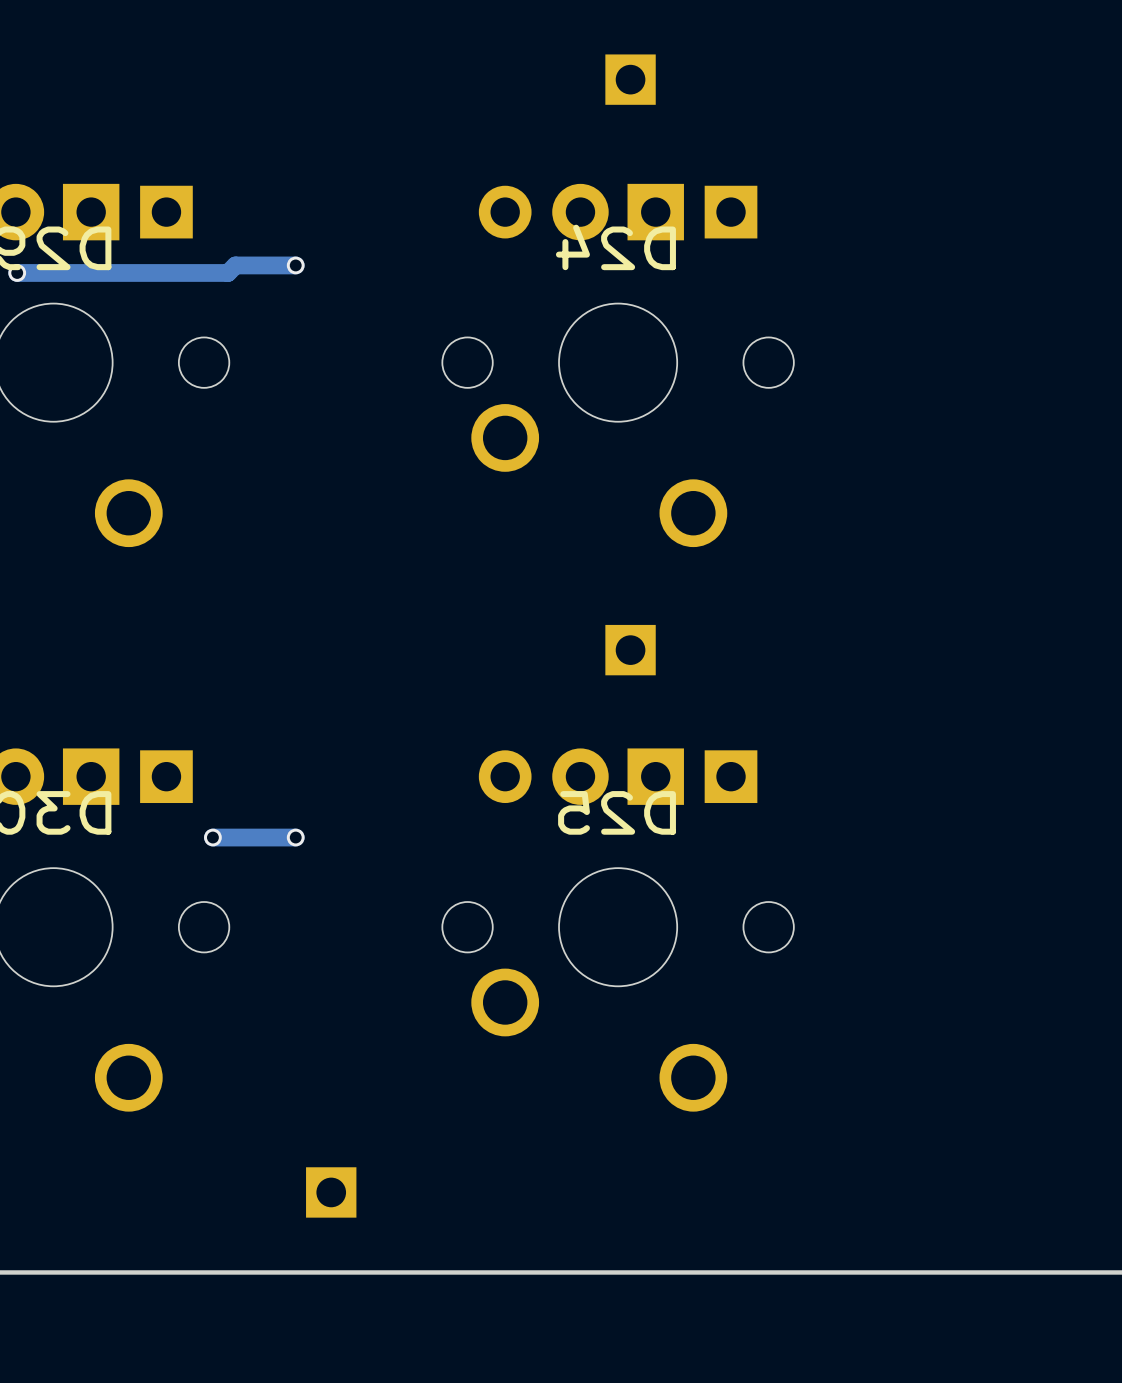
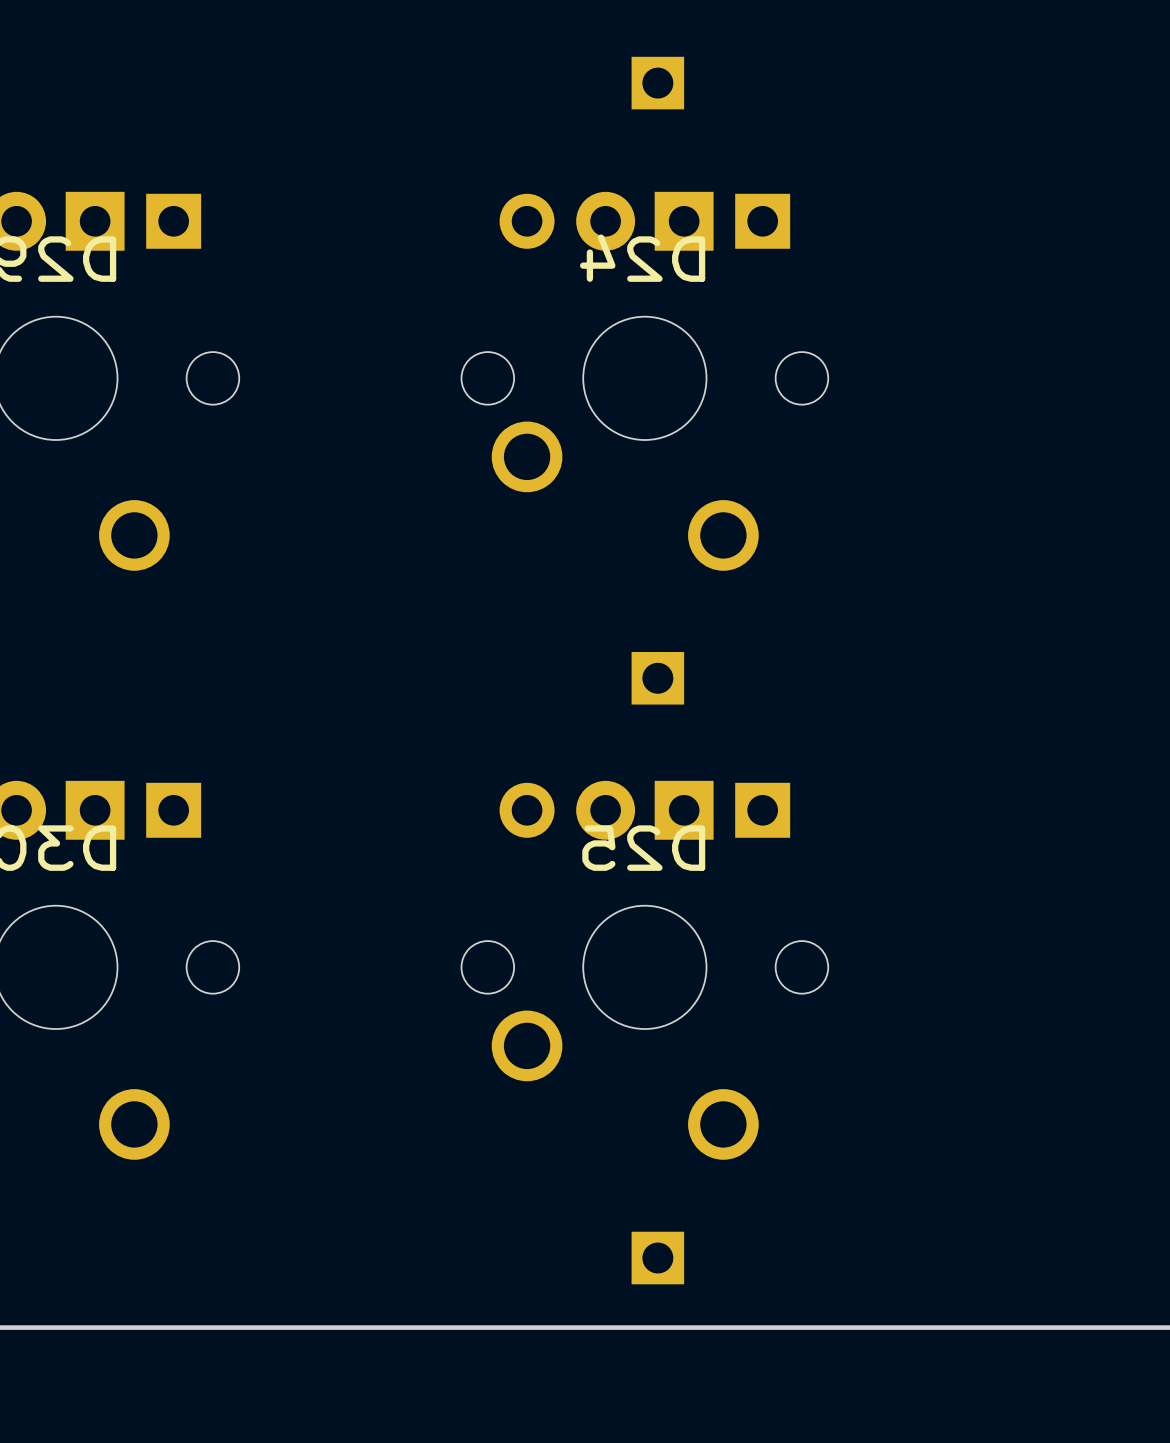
track: (295, 265) (235, 265) (227, 272) (17, 272) -> none
via: (295, 265) -> none
via: (17, 272) -> none
via: (212, 837) -> none
track: (295, 837) (212, 837) -> none
via: (295, 837) -> none
part position: (331, 1192) -> (657, 1258)

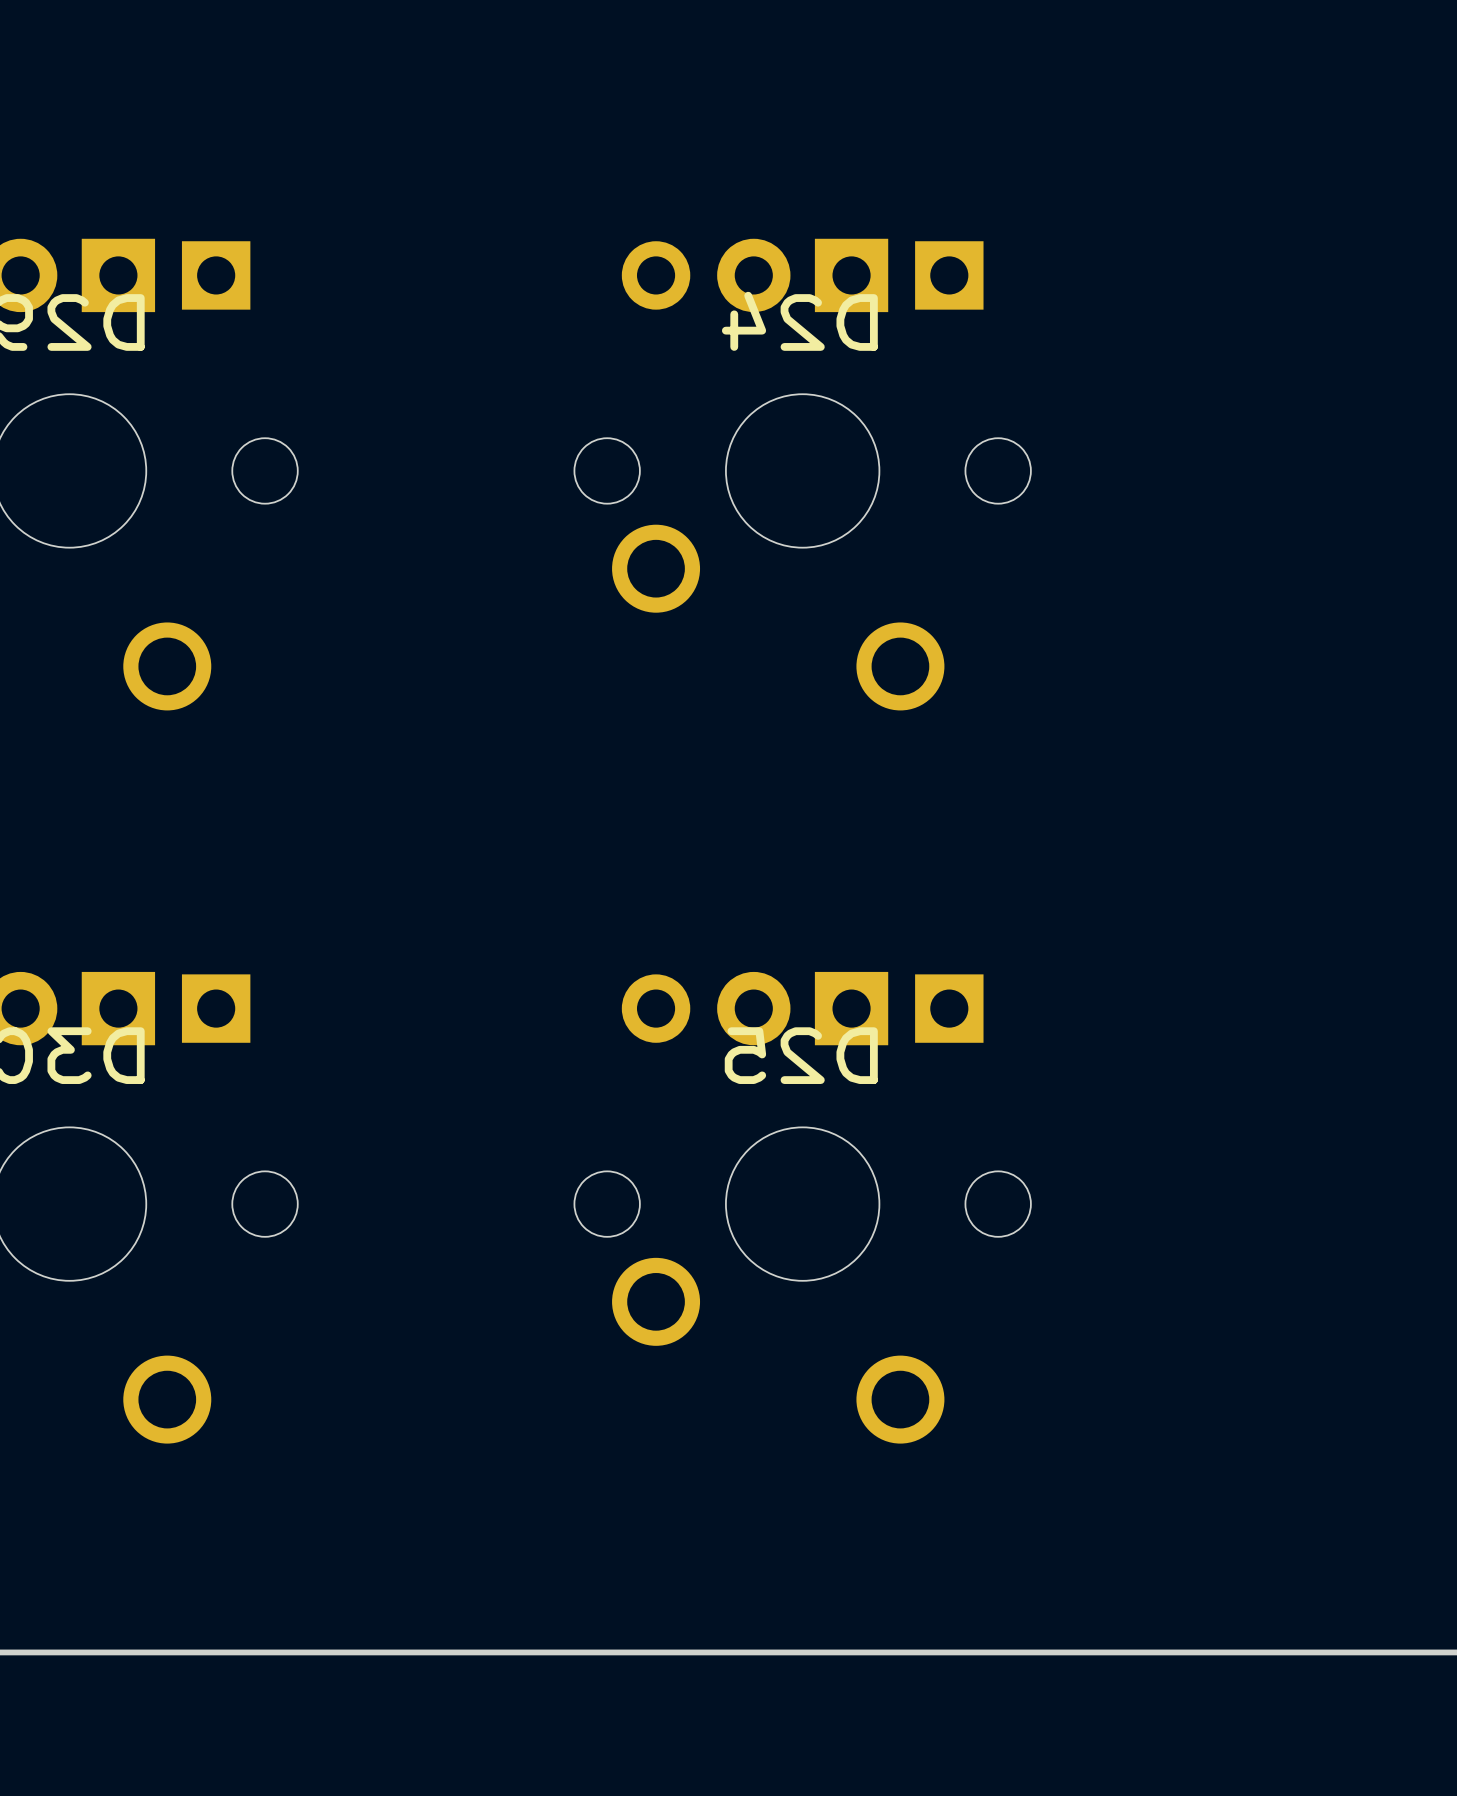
part: (657, 83) -> none
part: (657, 678) -> none
part: (657, 1258) -> none

